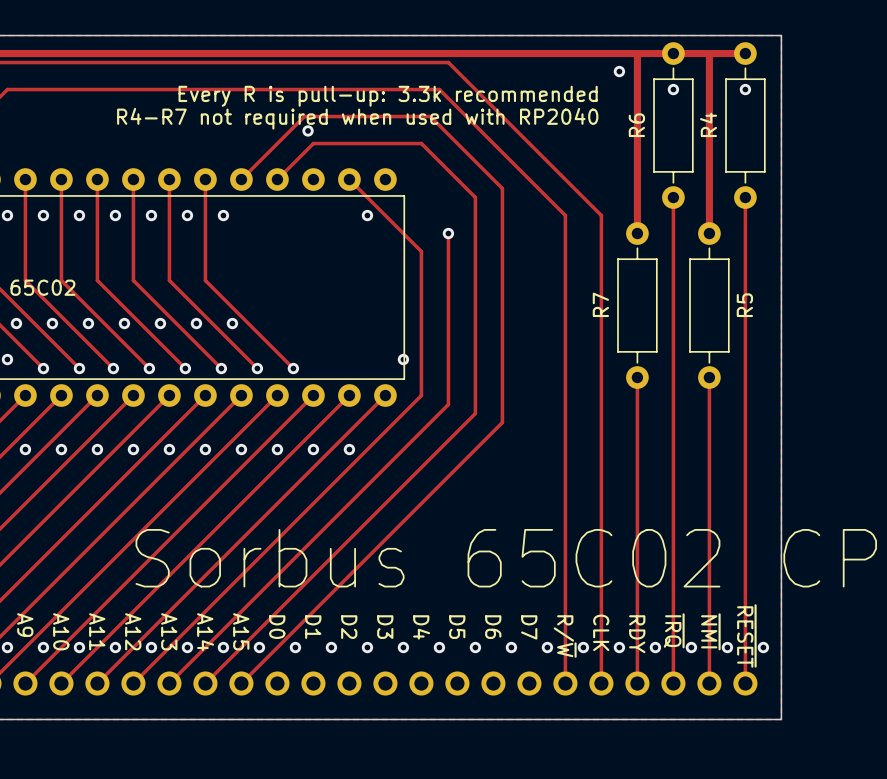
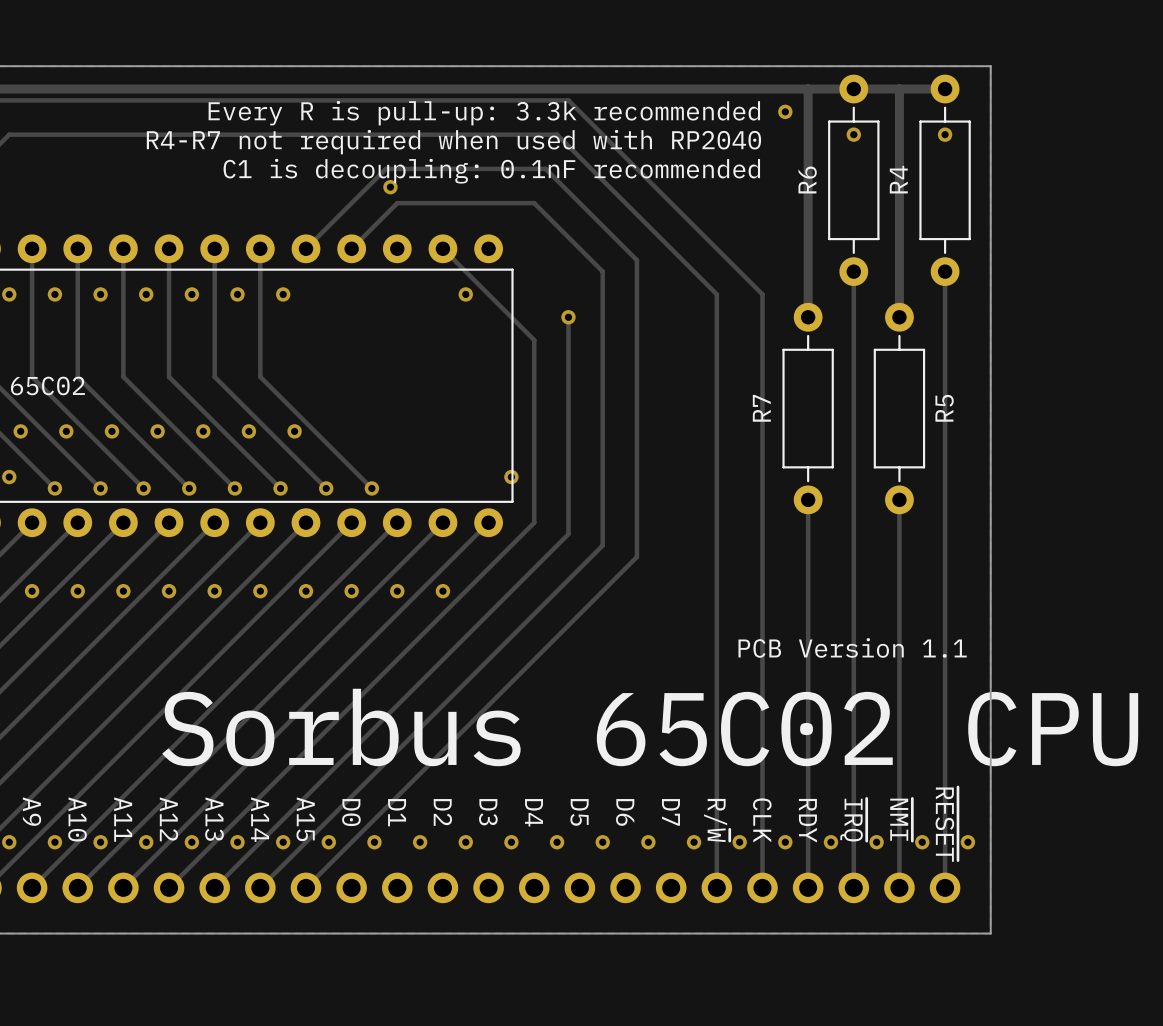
text: none -> Every R is pull-up: 3.3k recommended (484, 113)
text: Every R is pull-up: 3.3k recommended (388, 96) -> R4-R7 not required when used with RP2040 (453, 142)
text: R4-R7 not required when used with RP2040 (357, 118) -> C1 is decoupling: 0.1nF recommended (491, 171)
text: none -> PCB Version 1.1 (852, 647)

